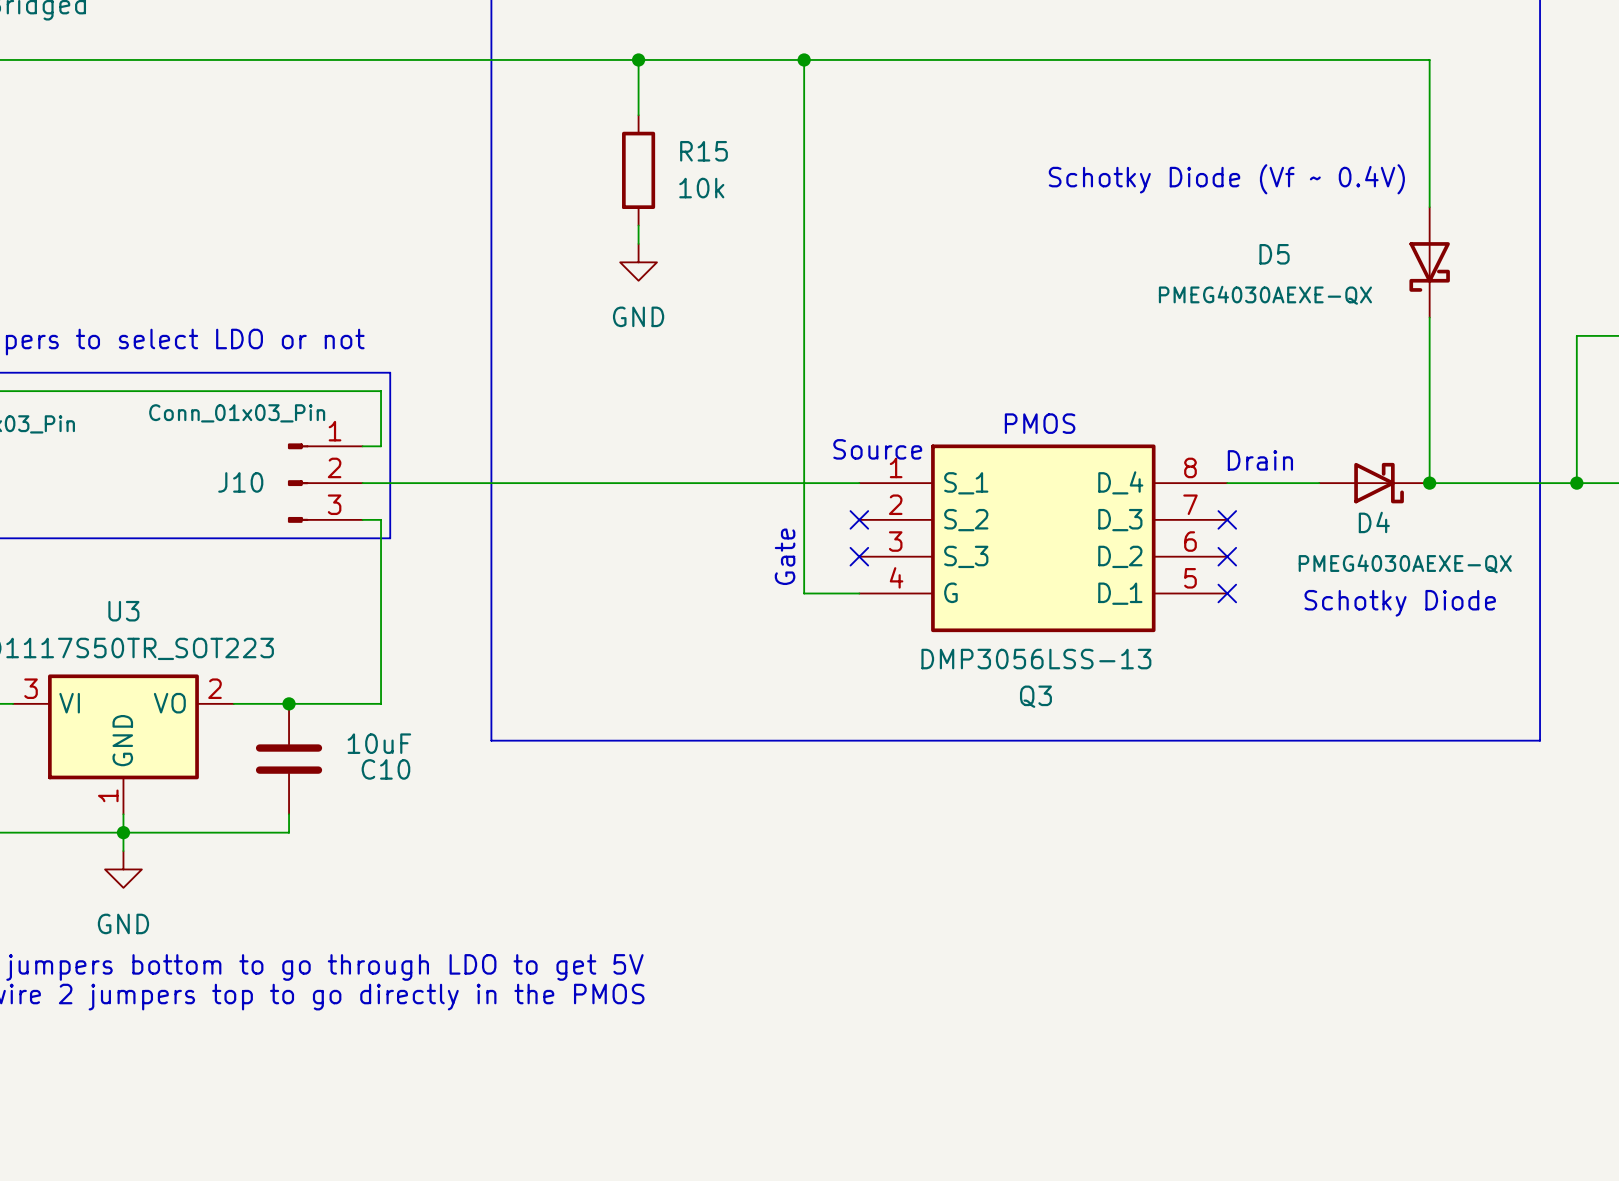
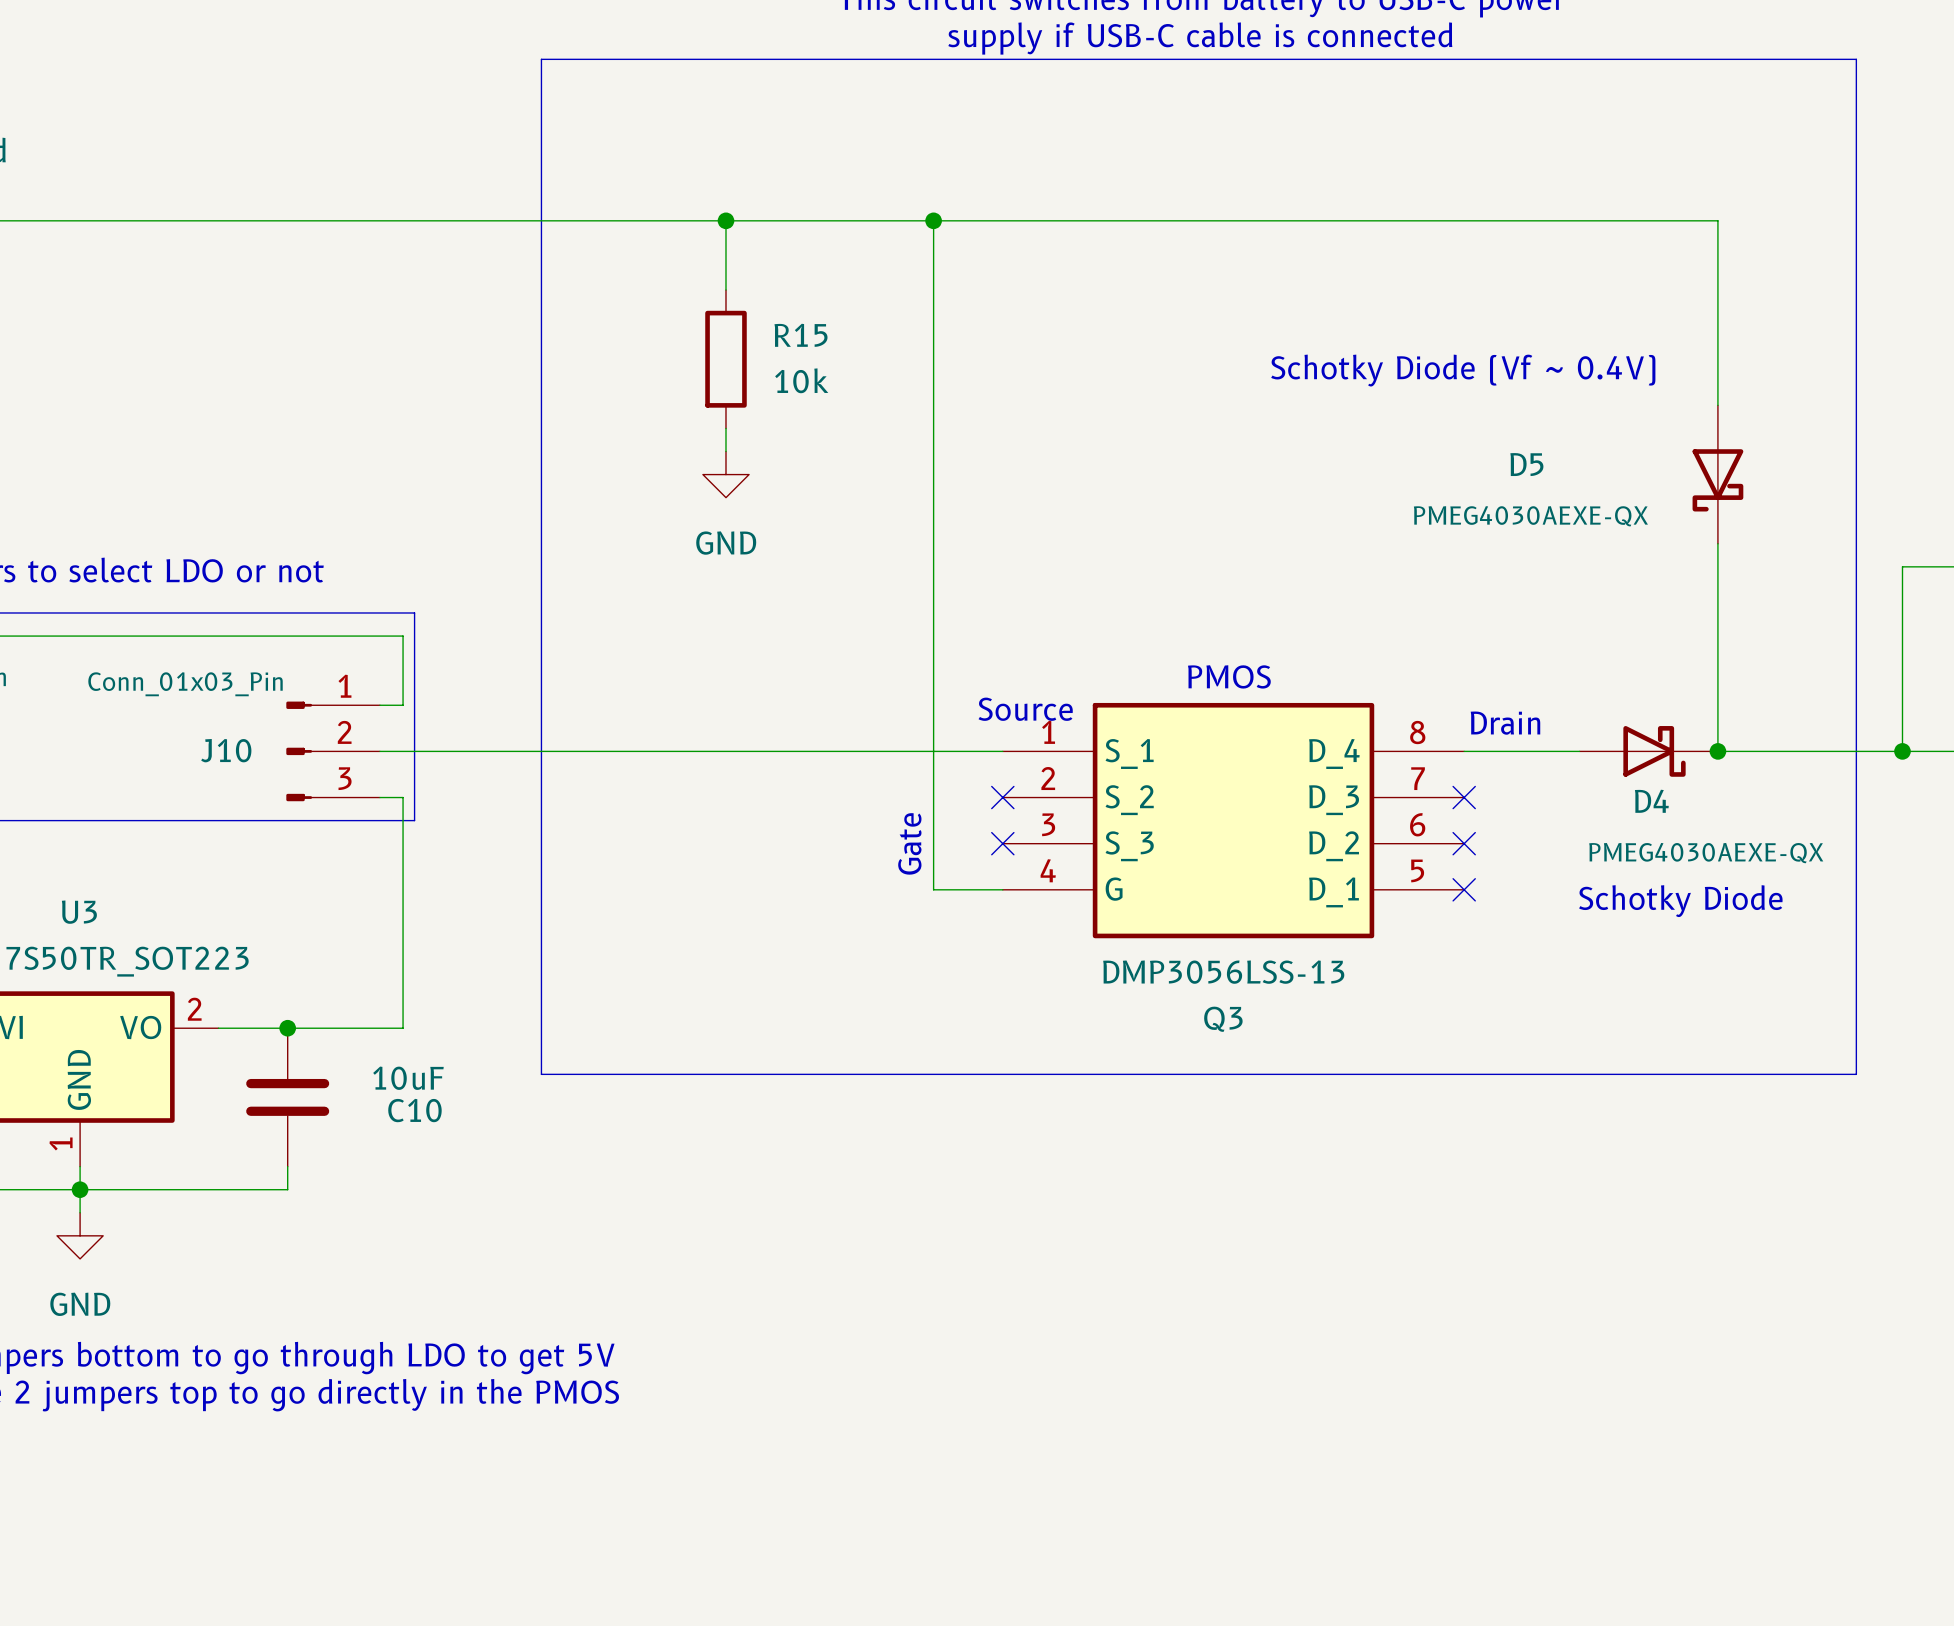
J10 value position: Conn_01x03_Pin (237, 413) -> Conn_01x03_Pin (185, 684)

